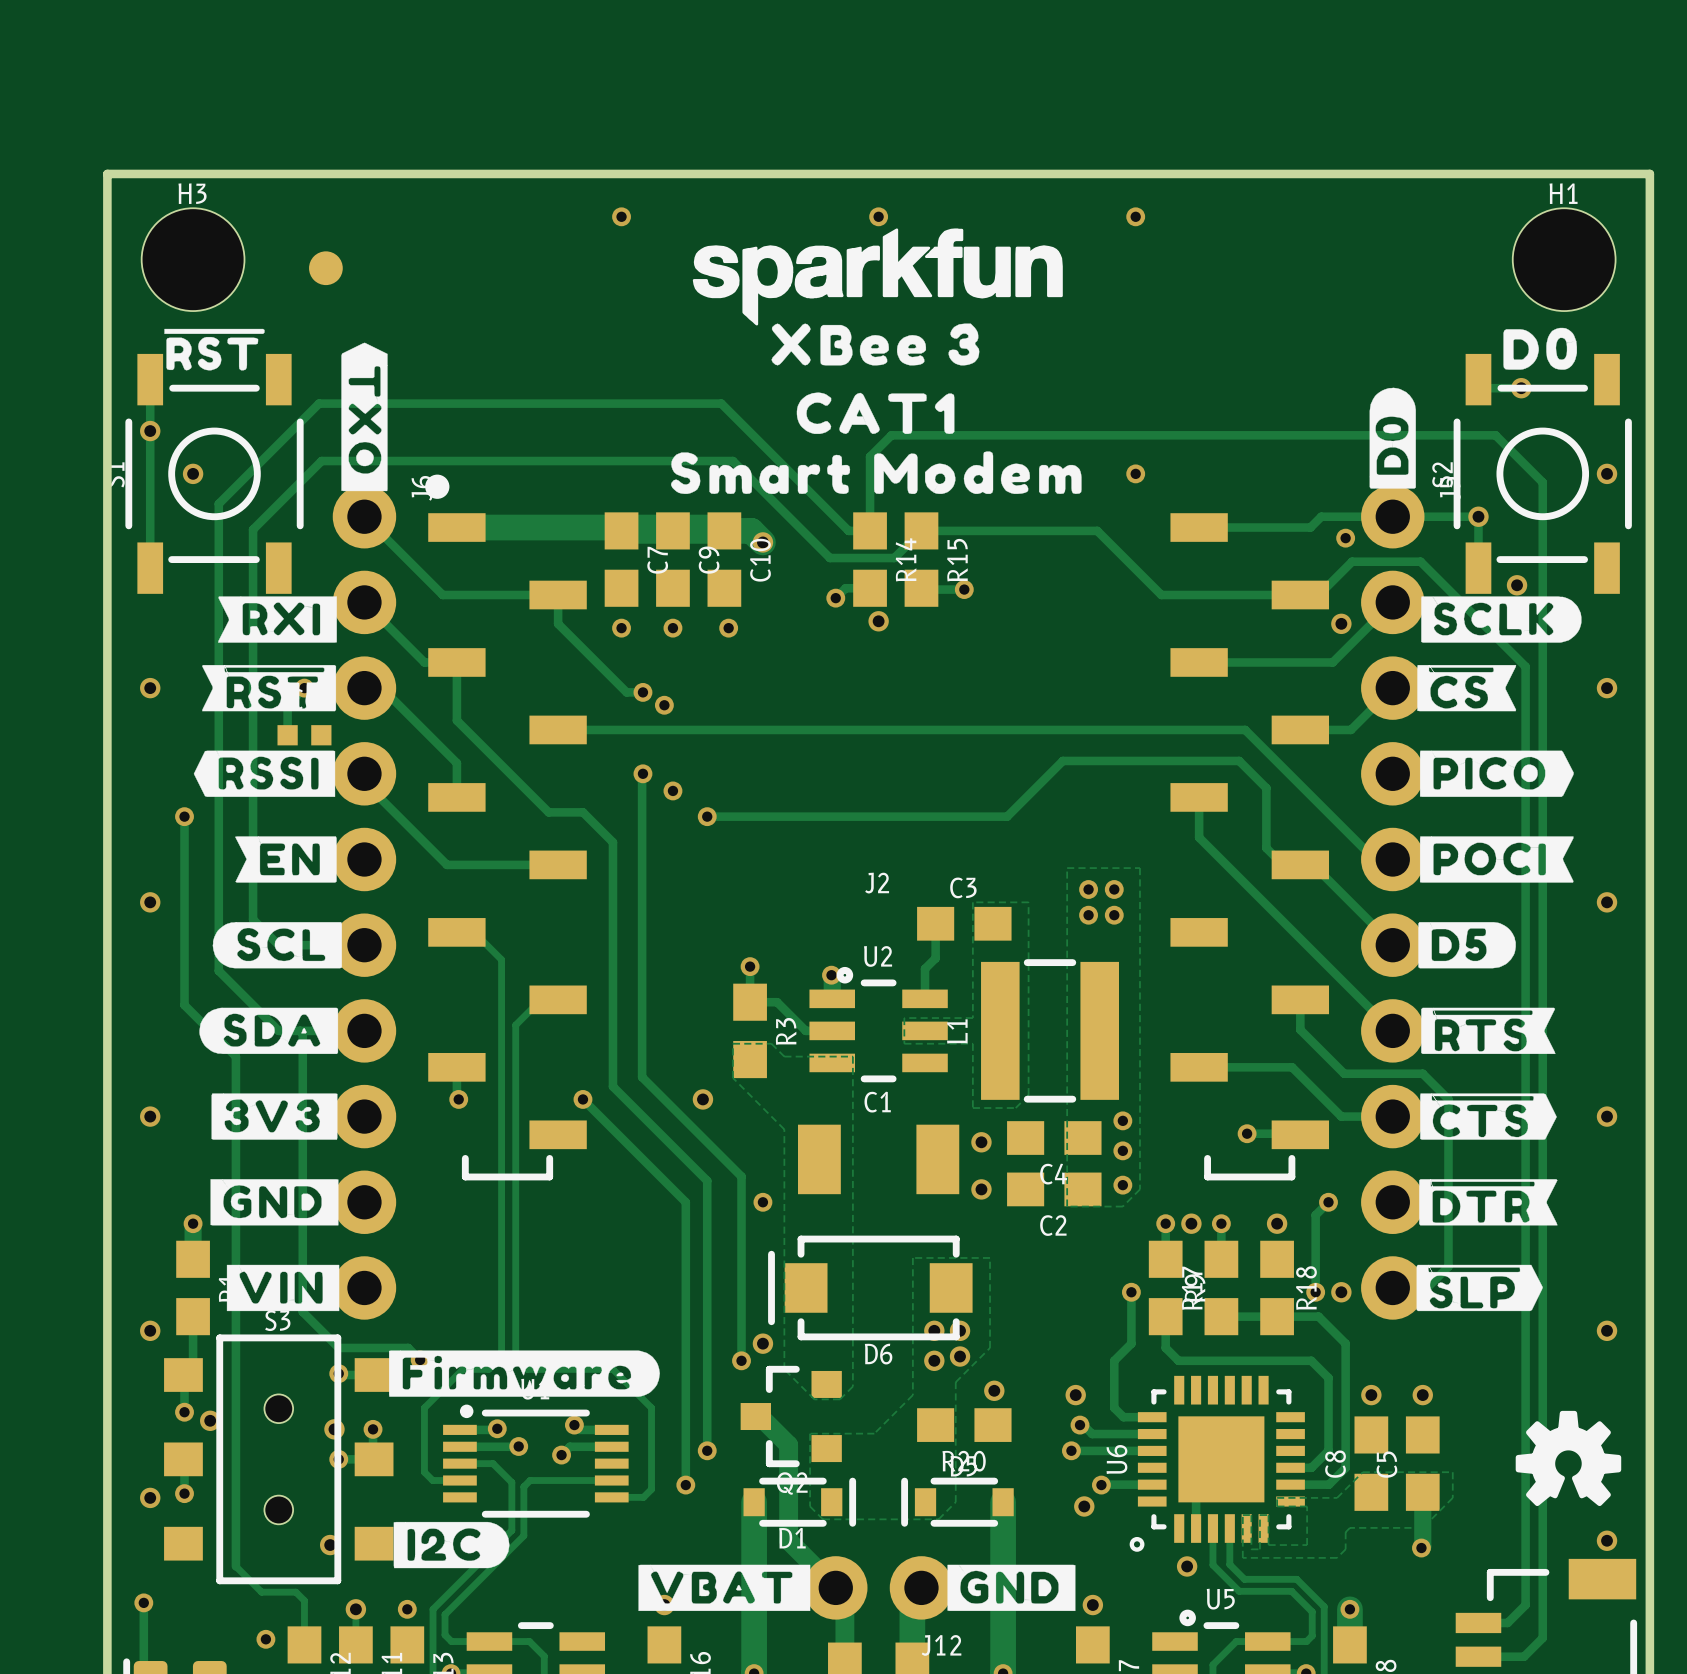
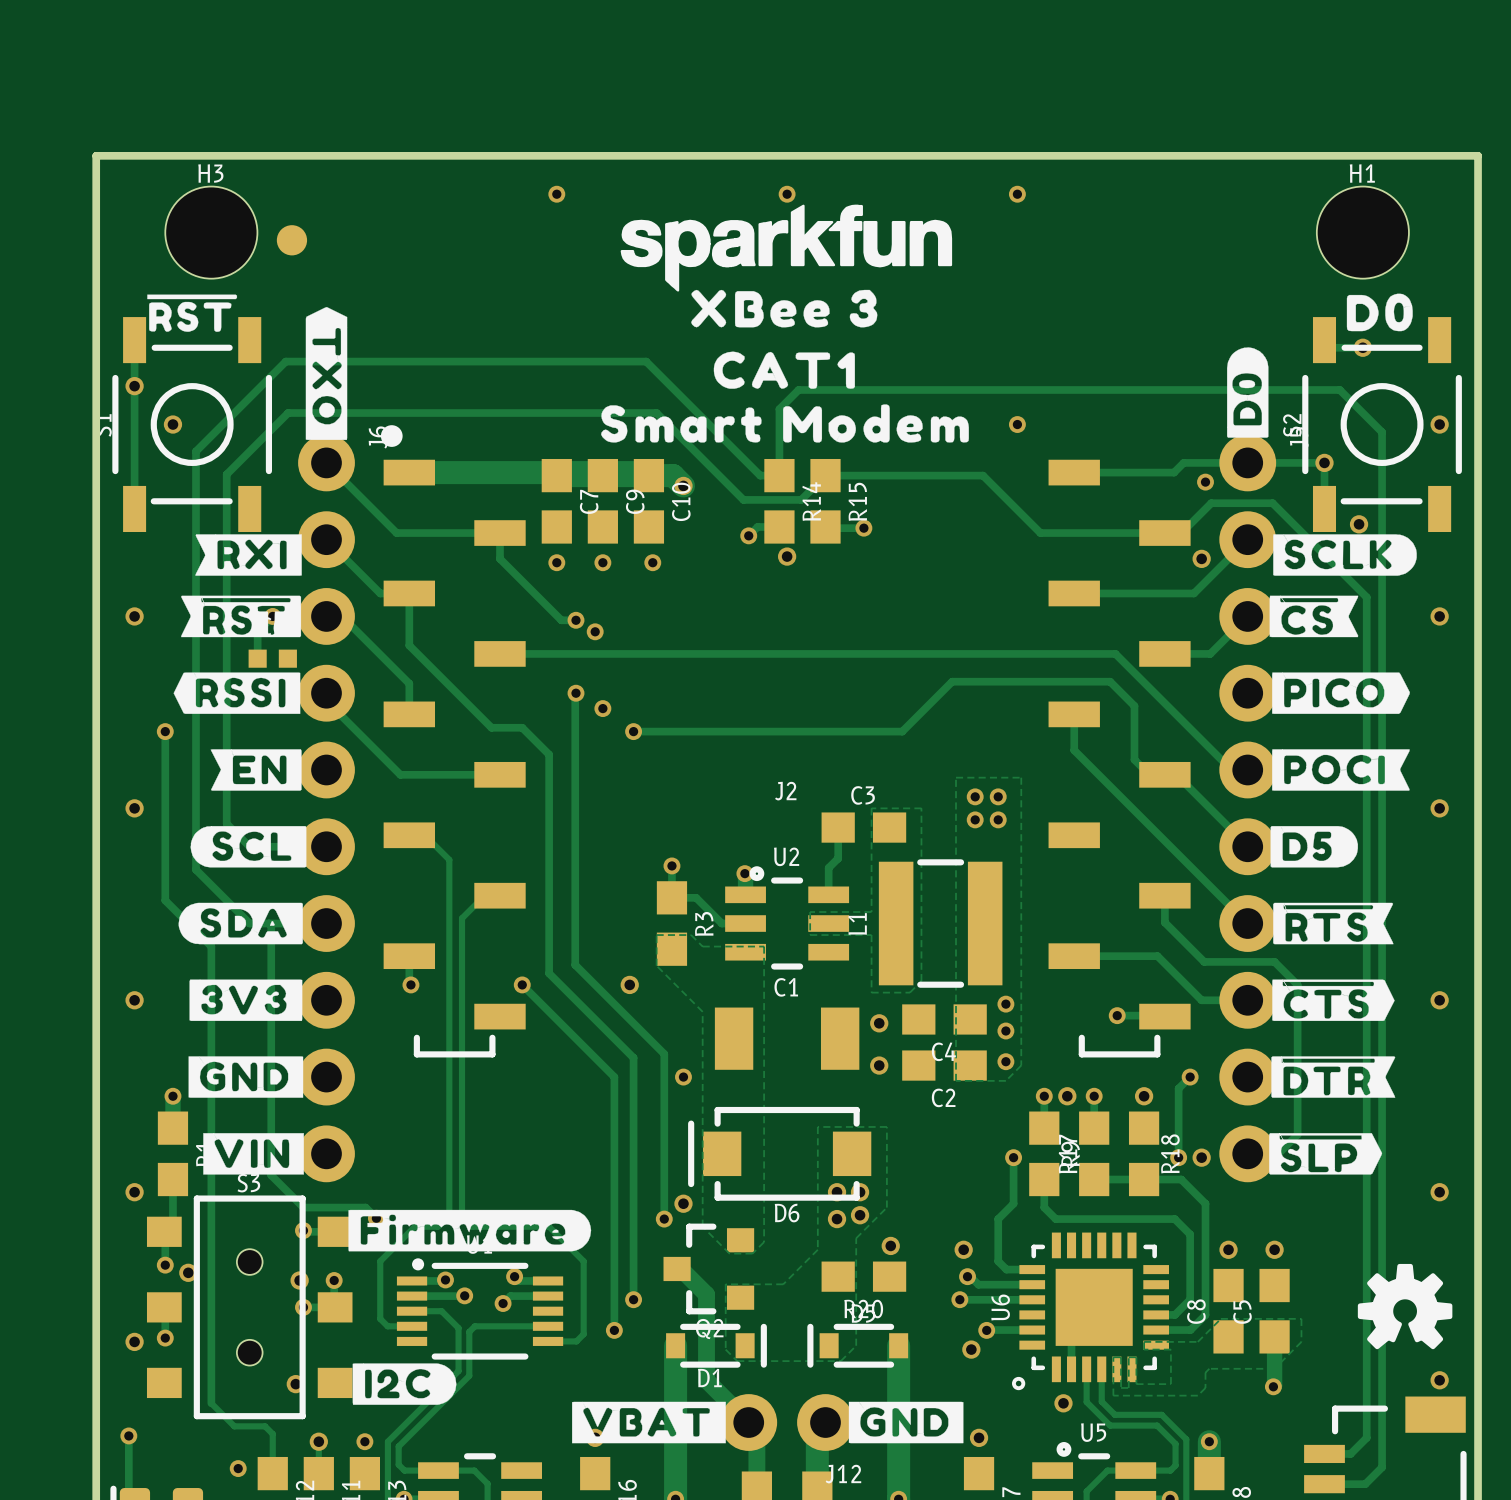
H3 position: (193, 259) -> (211, 232)
H1 position: (1564, 259) -> (1362, 232)

